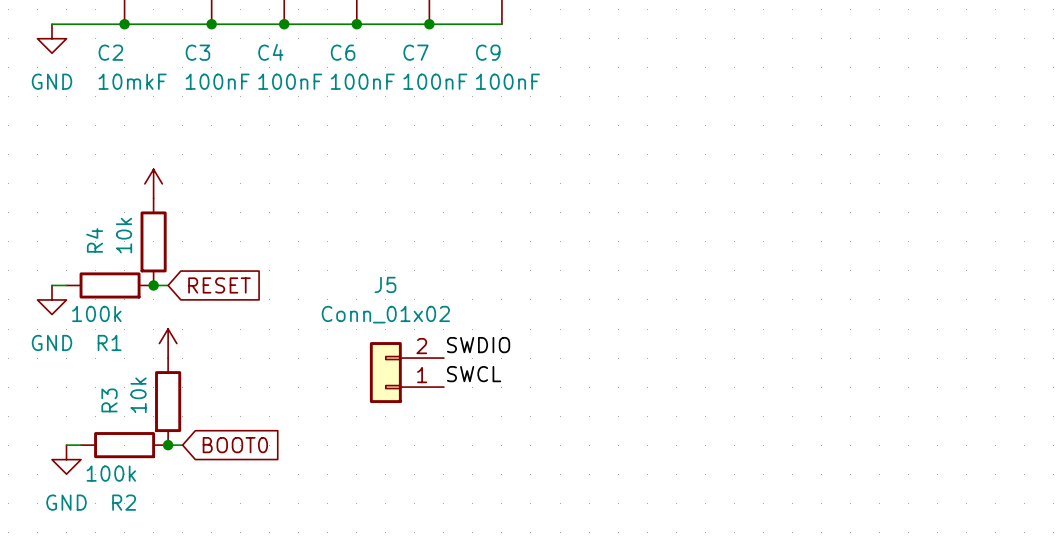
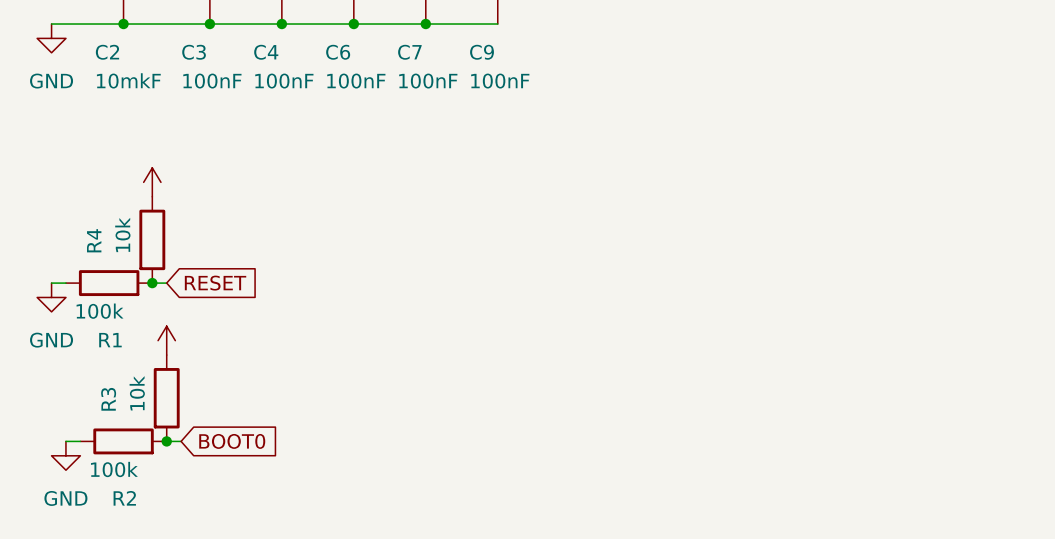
label: SWDIO (478, 345) -> none
J5: Conn_01x02 (406, 372) -> none
label: SWCL (474, 374) -> none

